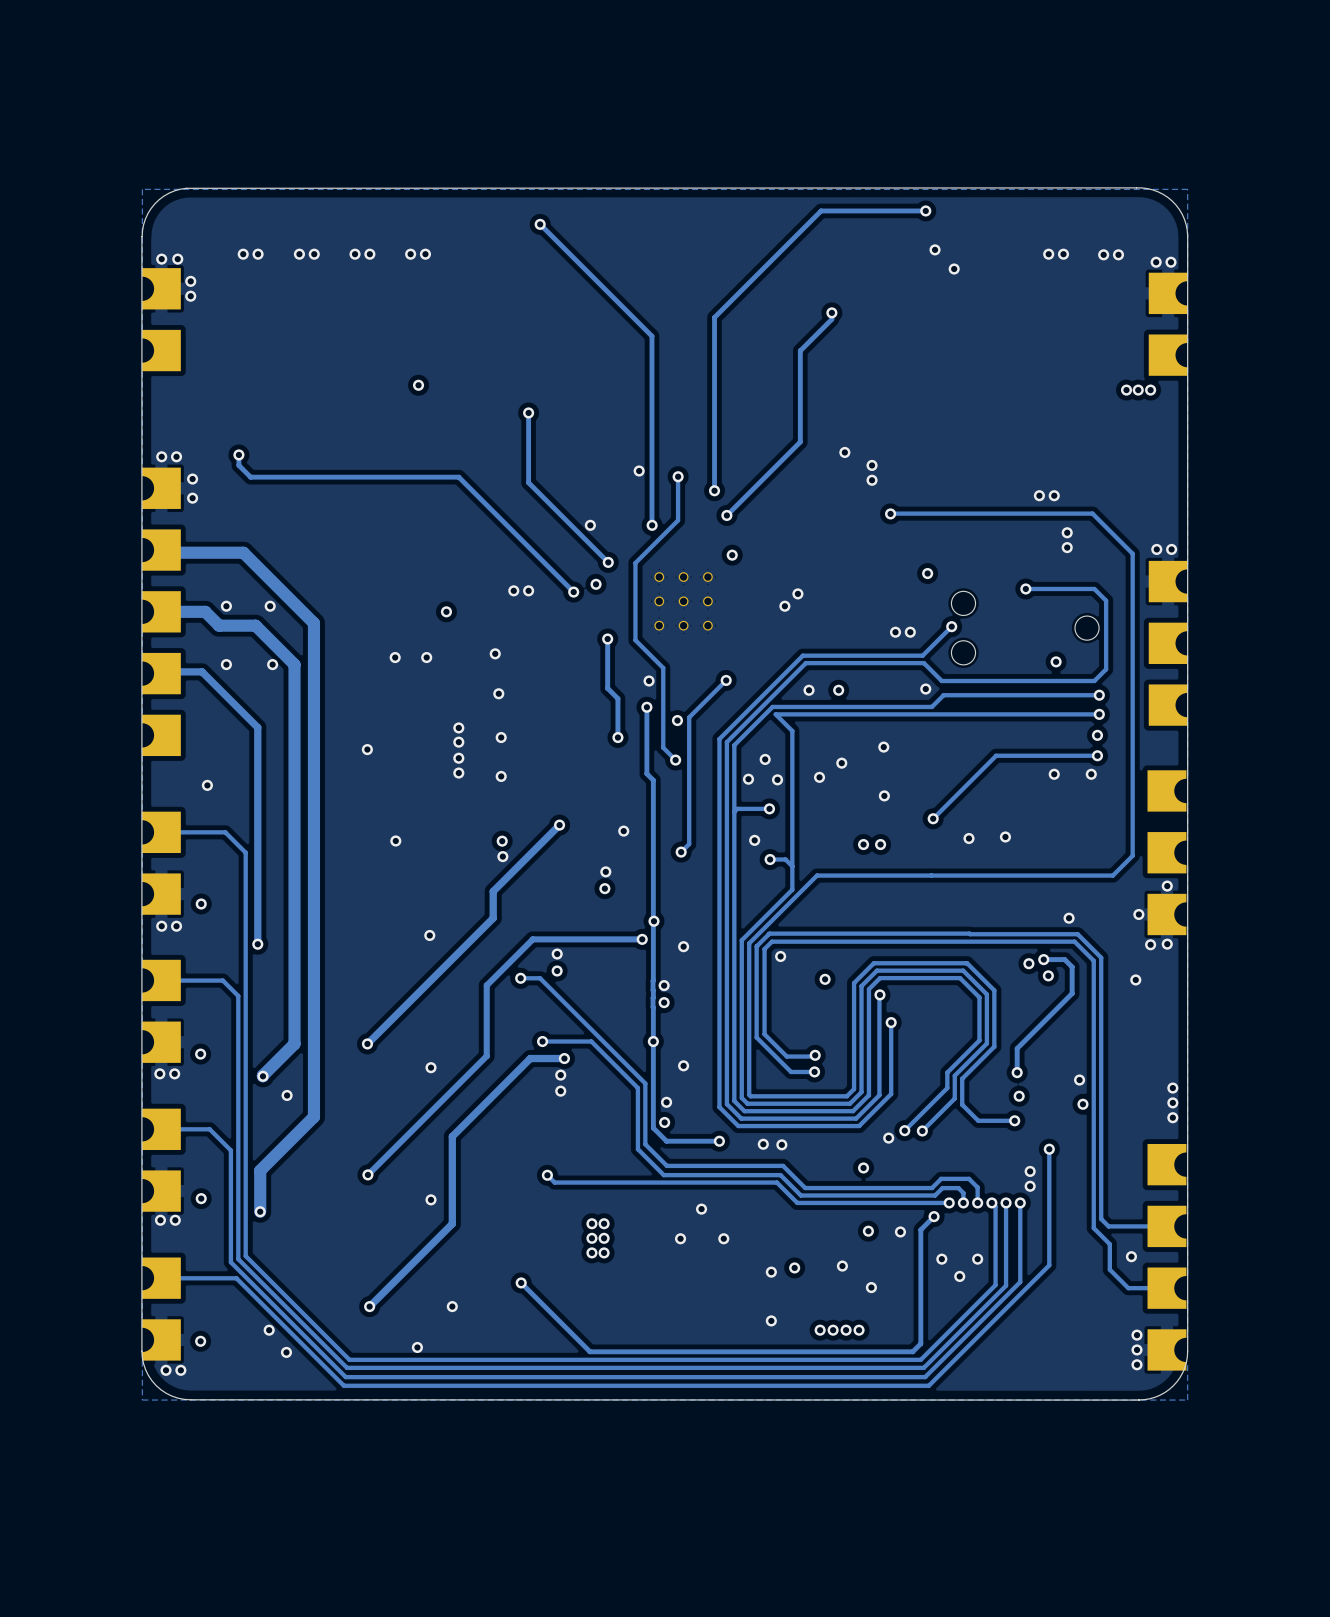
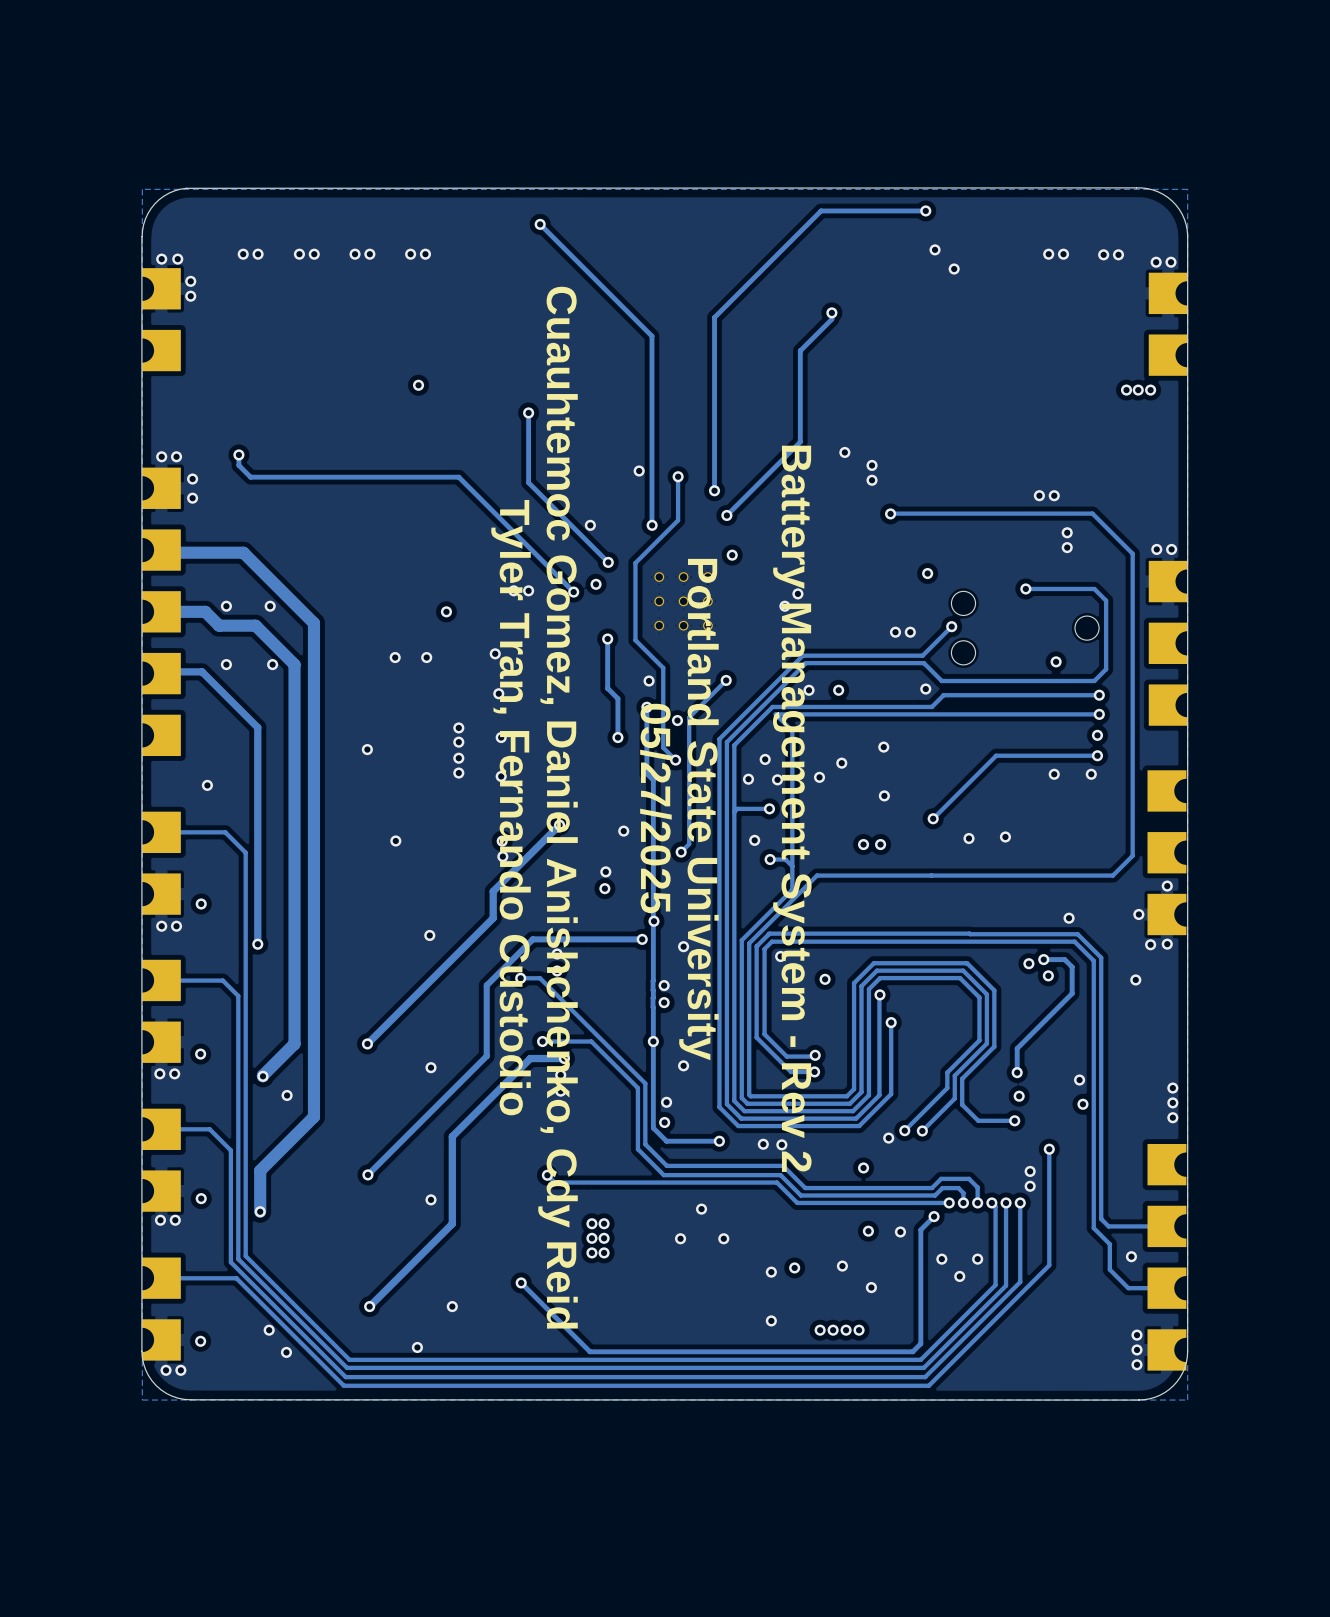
text: none -> Tyler Tran, Fernando Custodio (511, 807)
text: none -> Cuauhtemoc Gomez, Daniel Anishchenko, Cdy Reid (558, 807)
text: none -> 05/27/2025 (655, 808)
text: none -> Battery Management System - Rev 2 (792, 808)
text: none -> Portland State University (698, 809)

